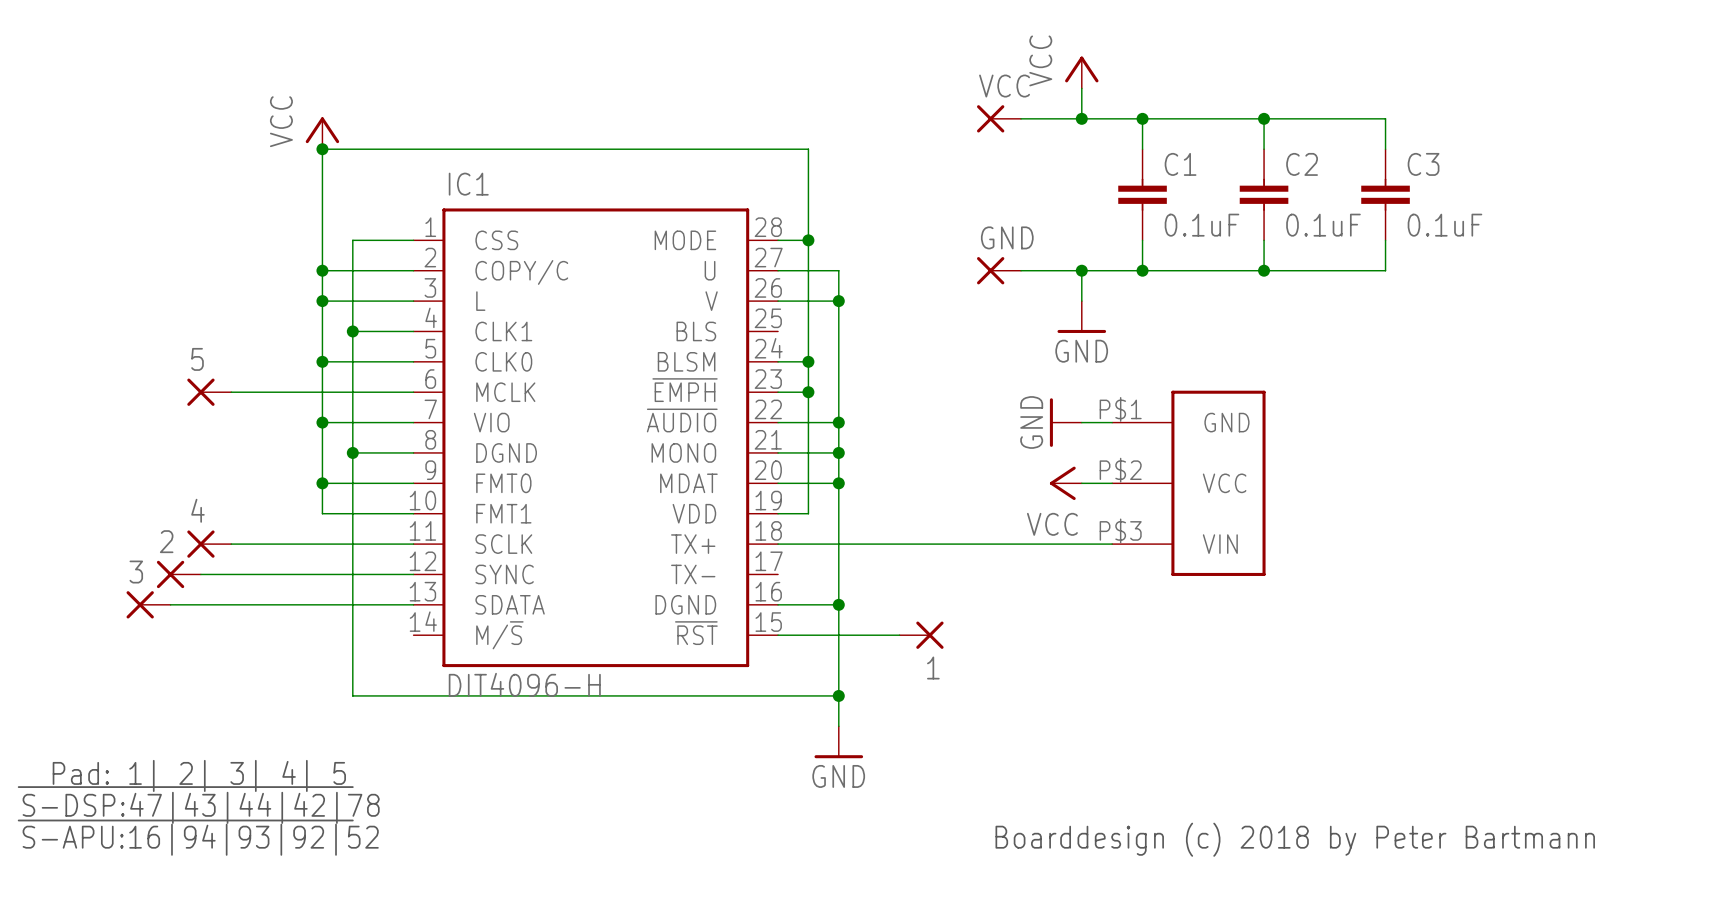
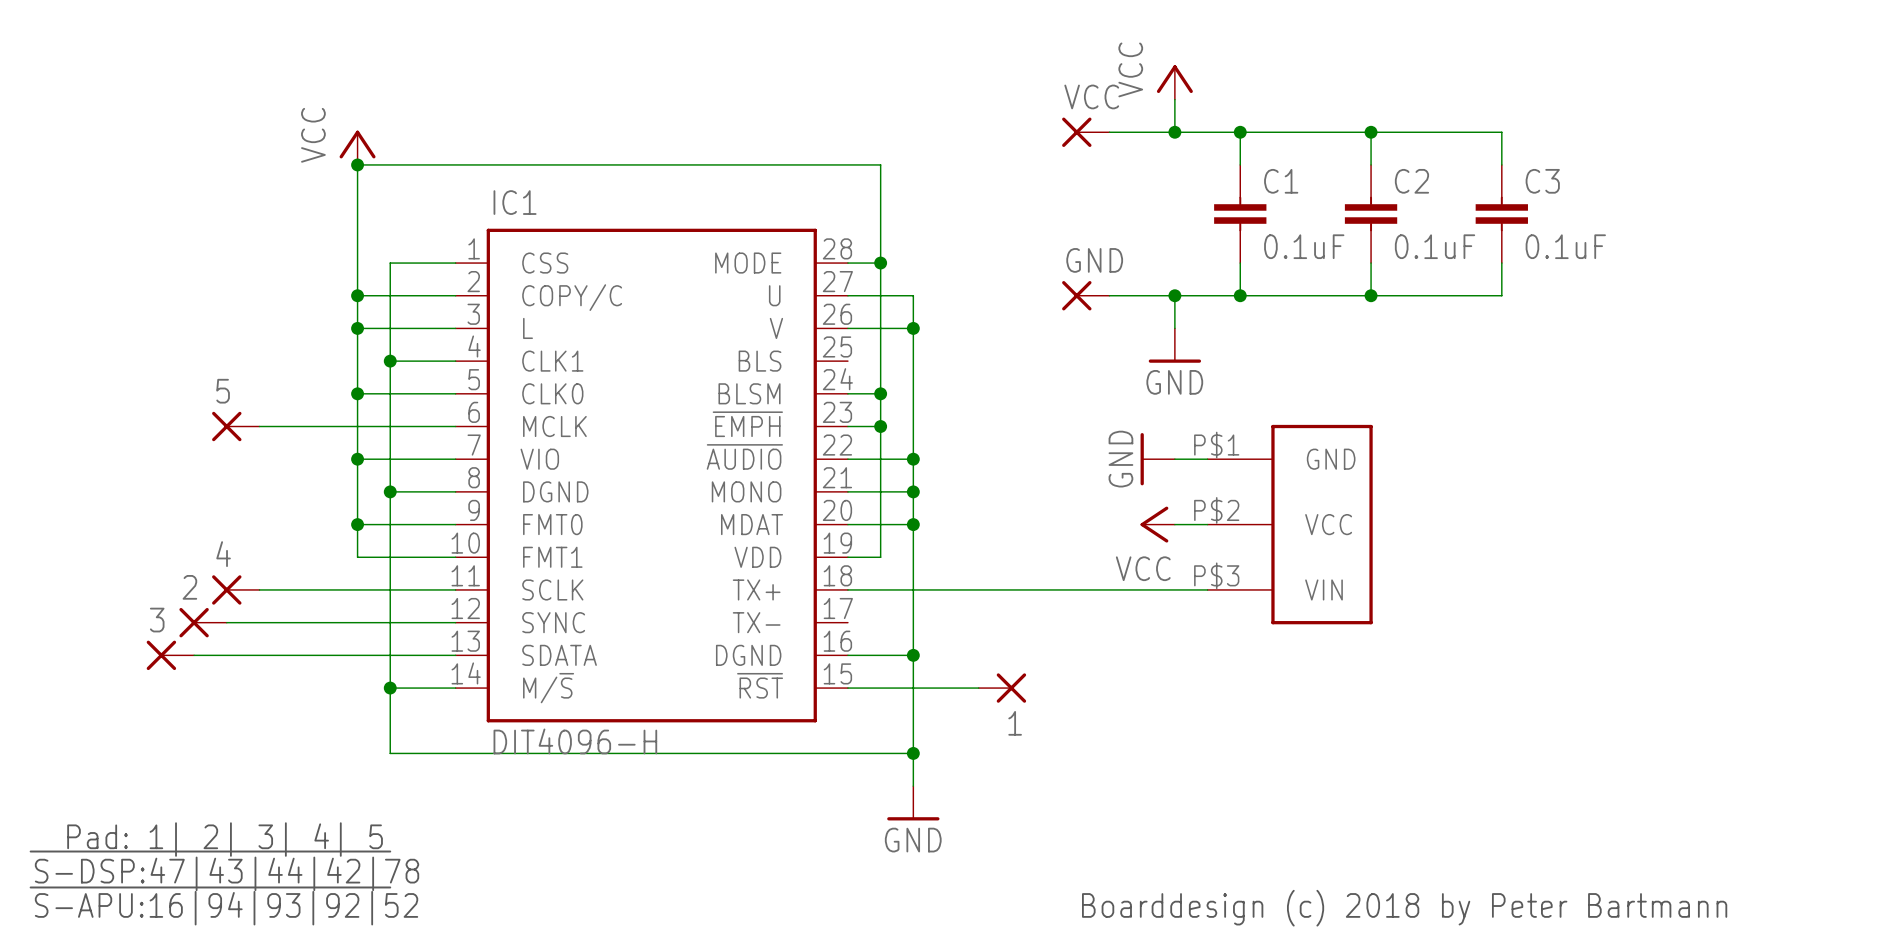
wire: none -> (390, 688) (455, 688)
junction: none -> (390, 688)

